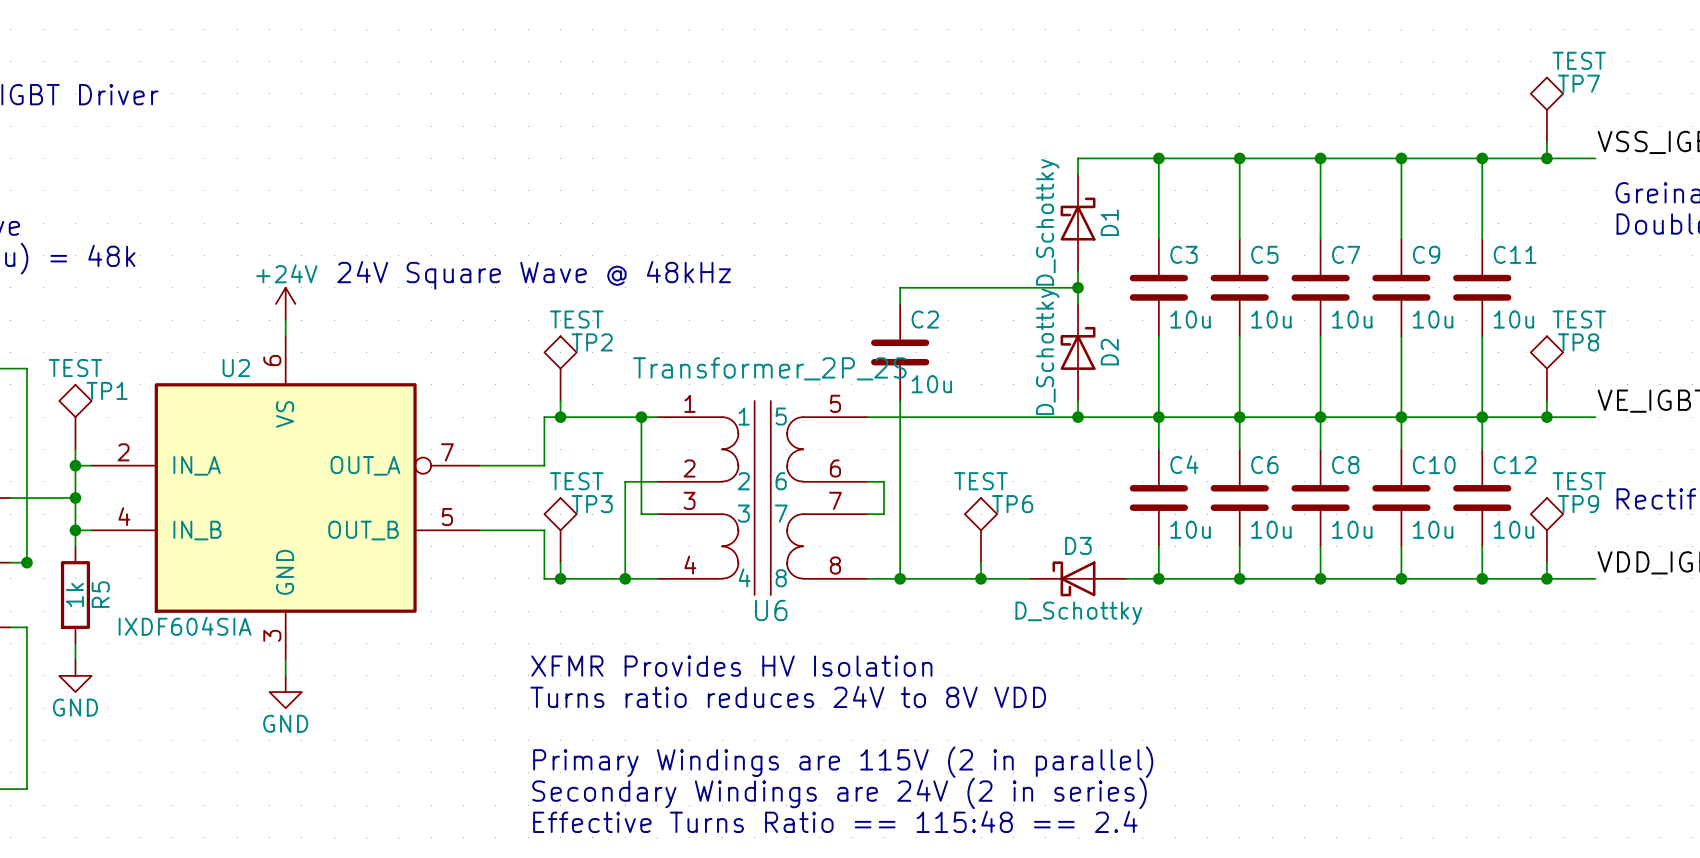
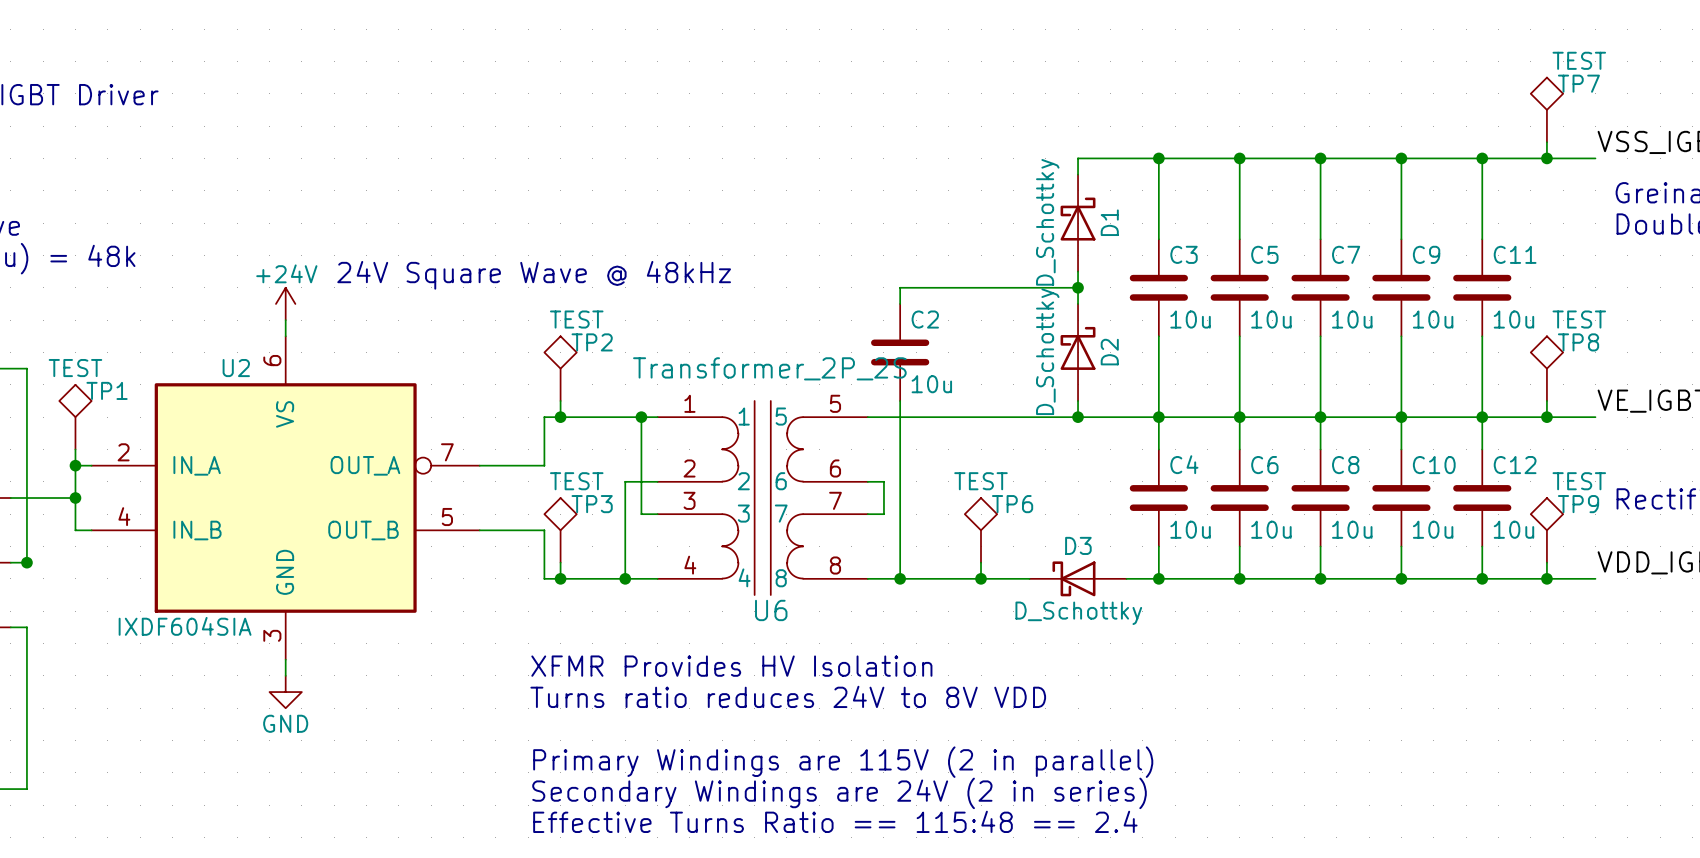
wire: (75, 530) (75, 546) -> none
junction: (75, 530) -> none
R5: 1k (75, 595) -> none
wire: (75, 643) (75, 659) -> none
power symbol: GND (75, 675) -> none

